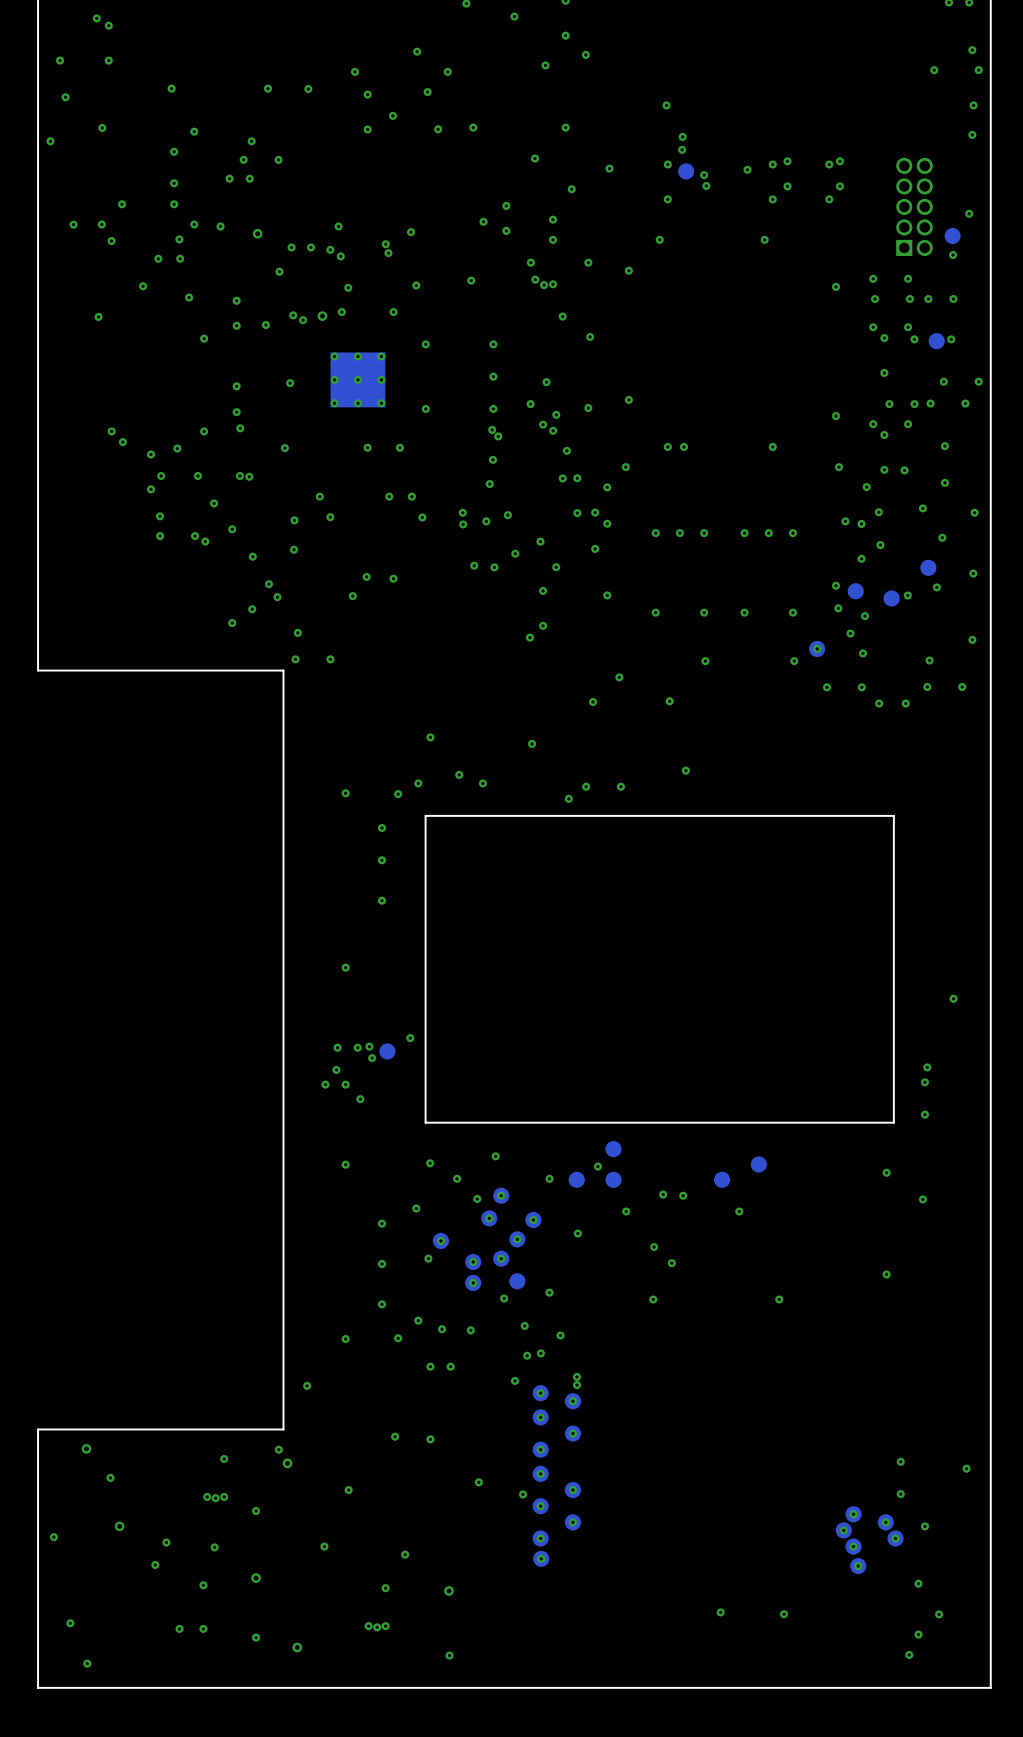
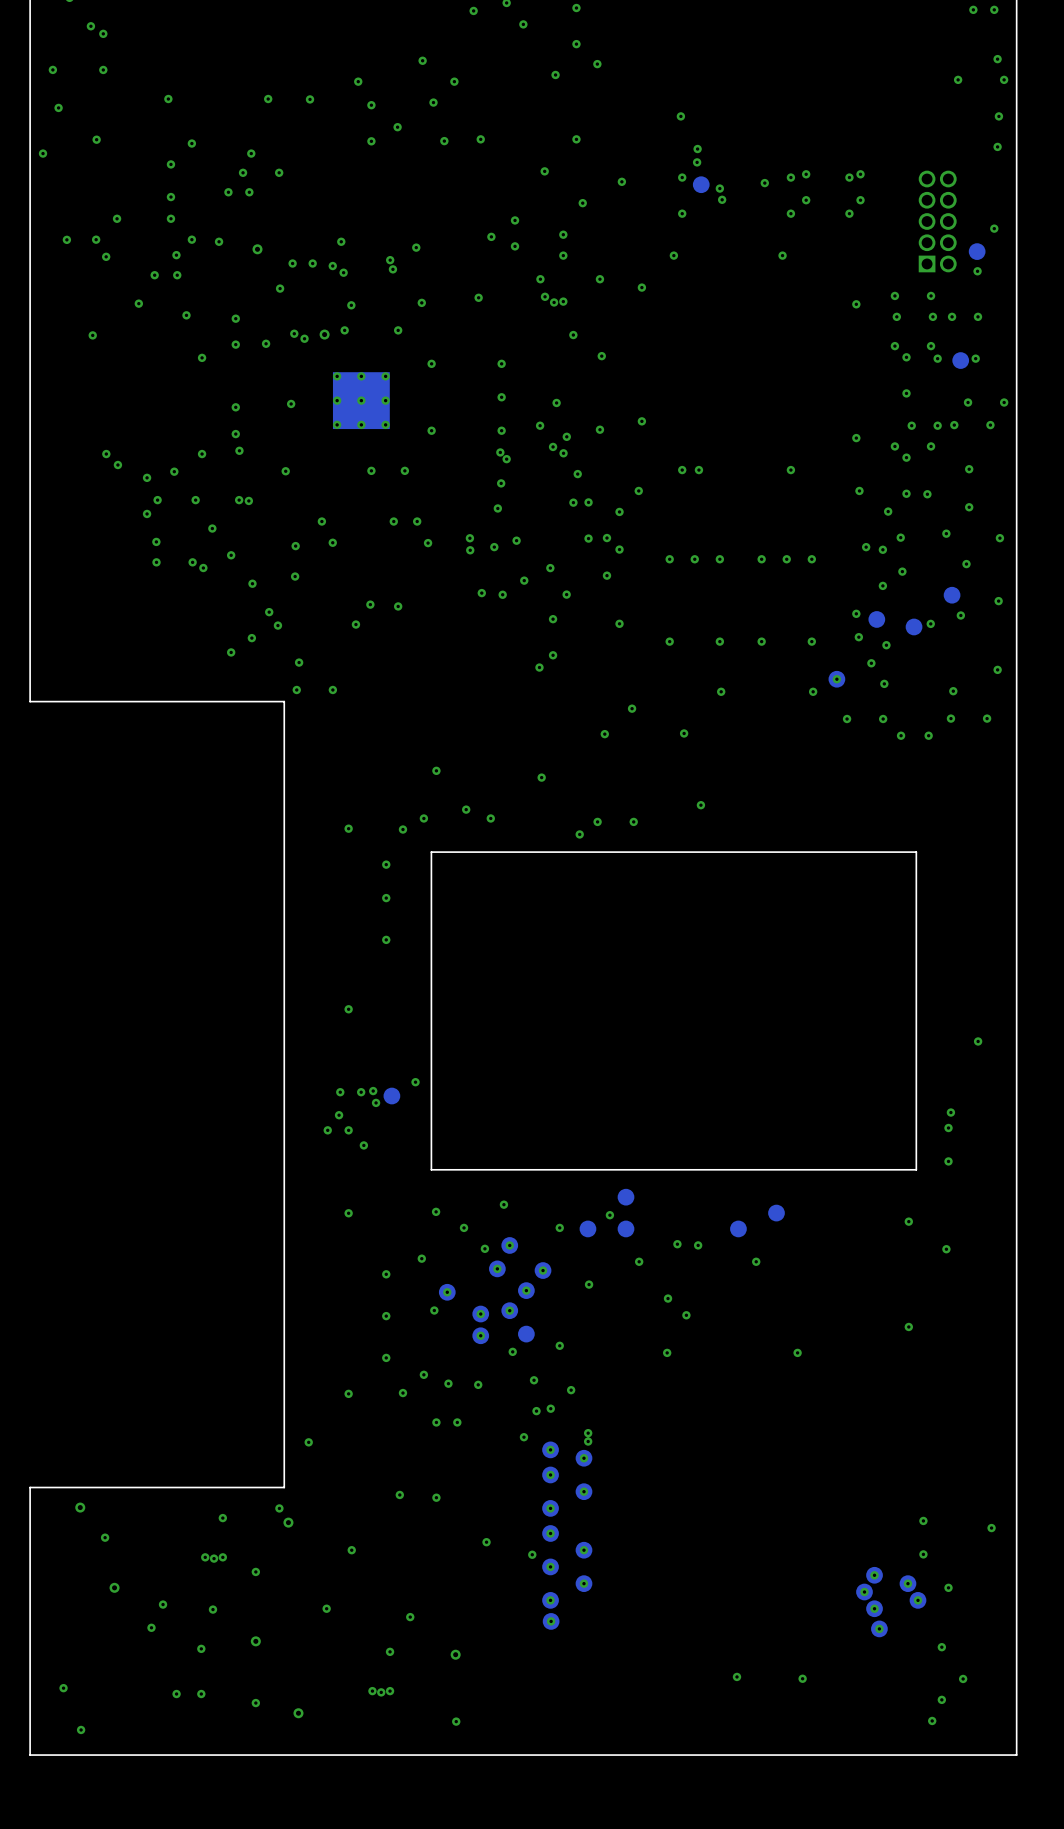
via: (53, 1537) -> none

